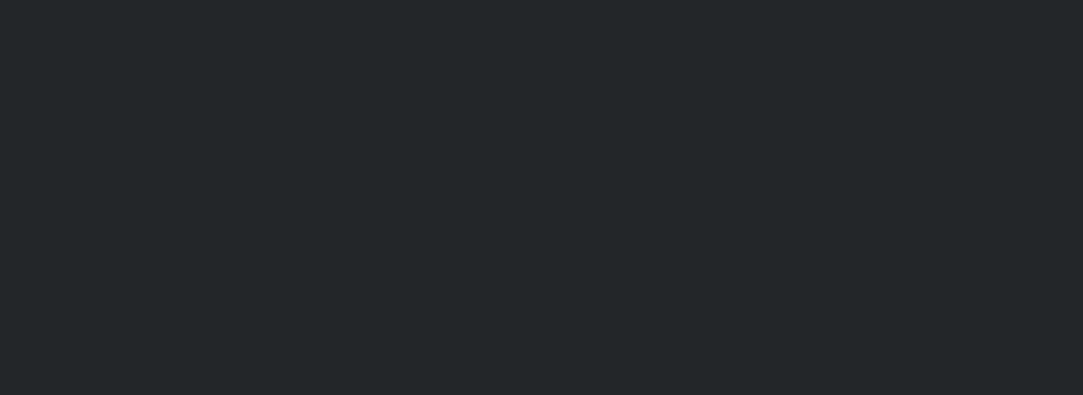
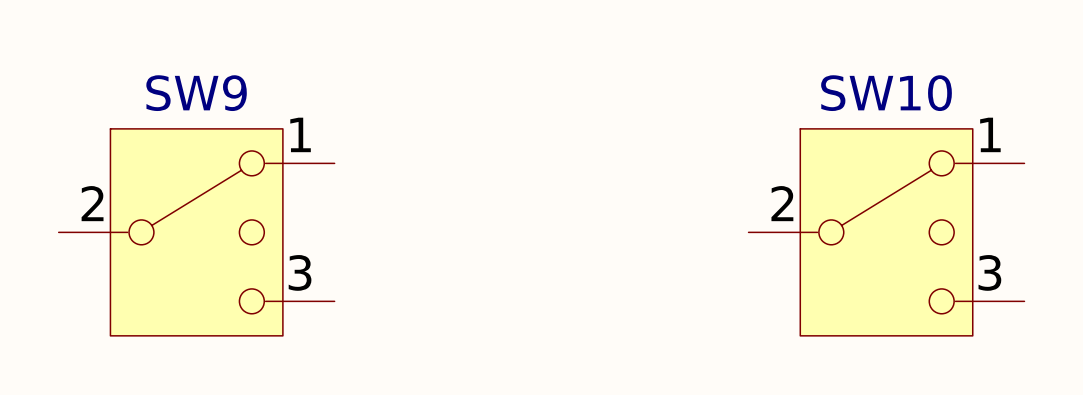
SW9: none -> (196, 232)
SW10: none -> (886, 232)

